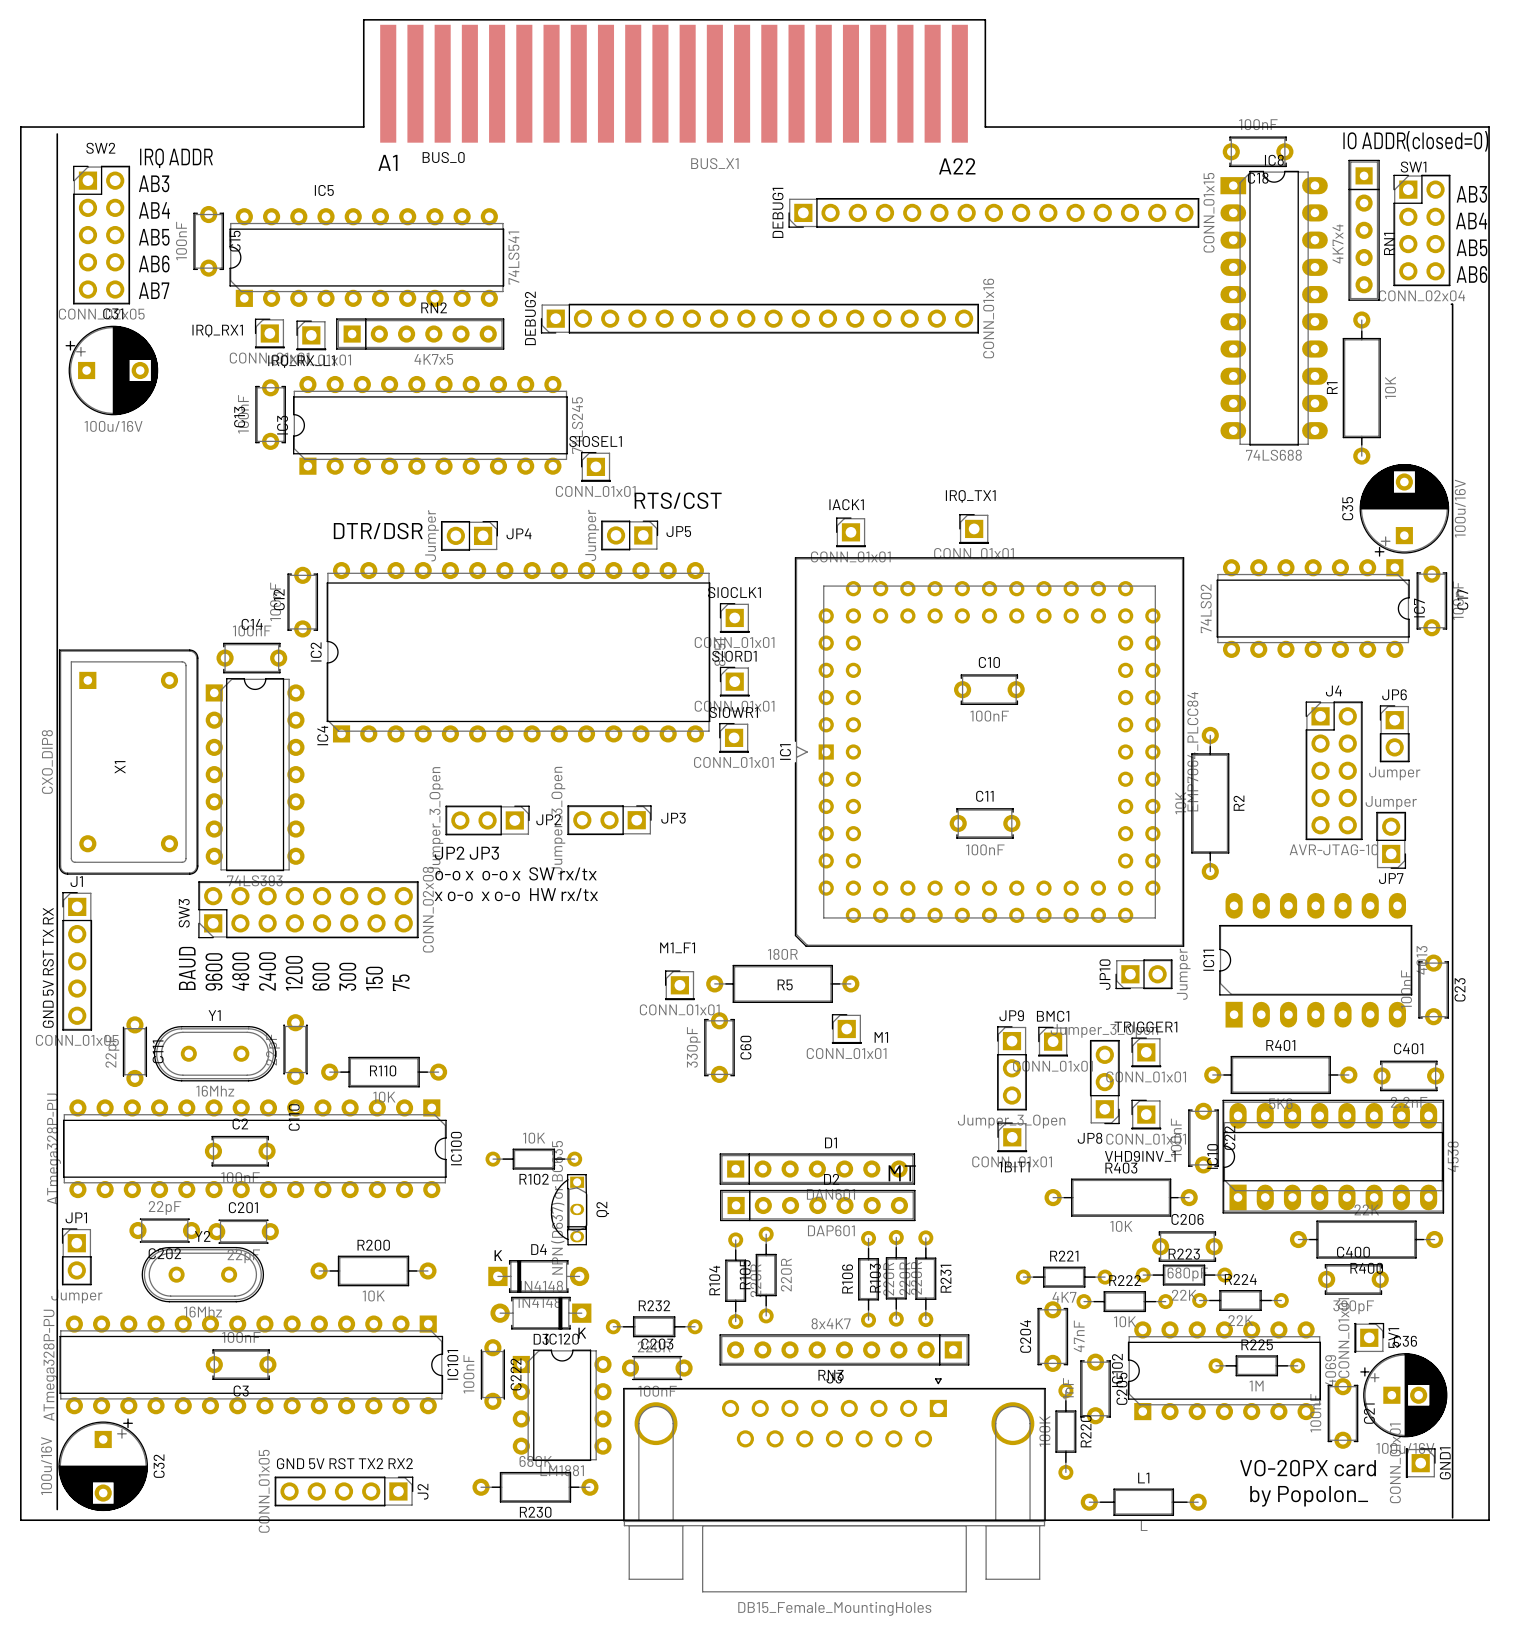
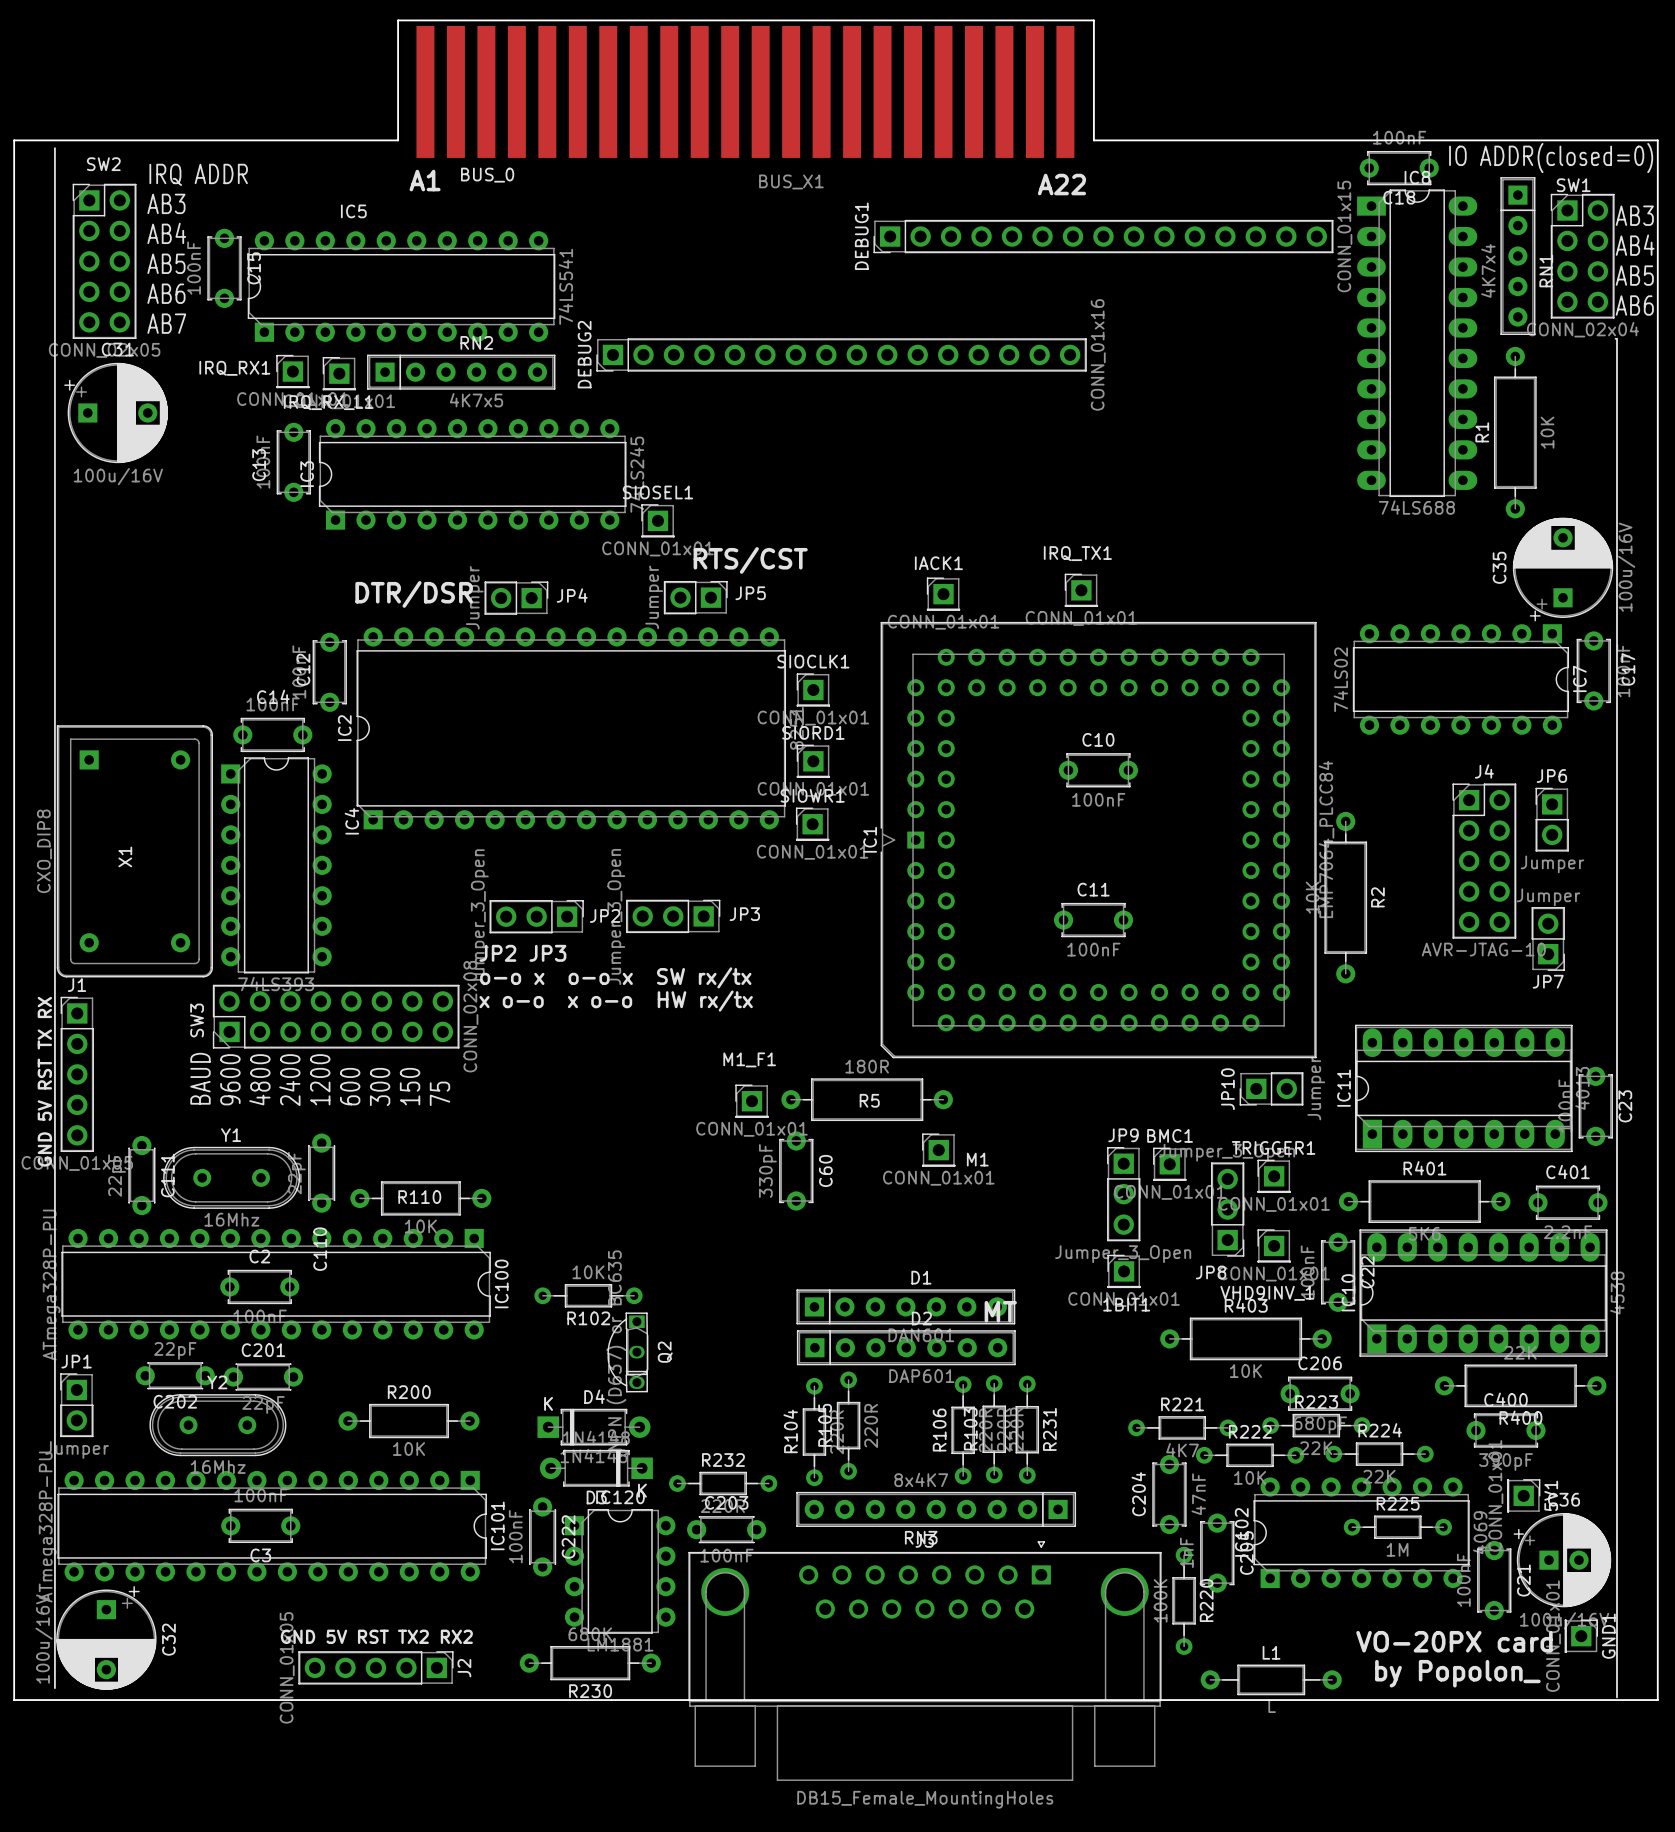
IC11 footprint: [1219, 892, 1413, 1028] -> [1355, 1024, 1573, 1153]

